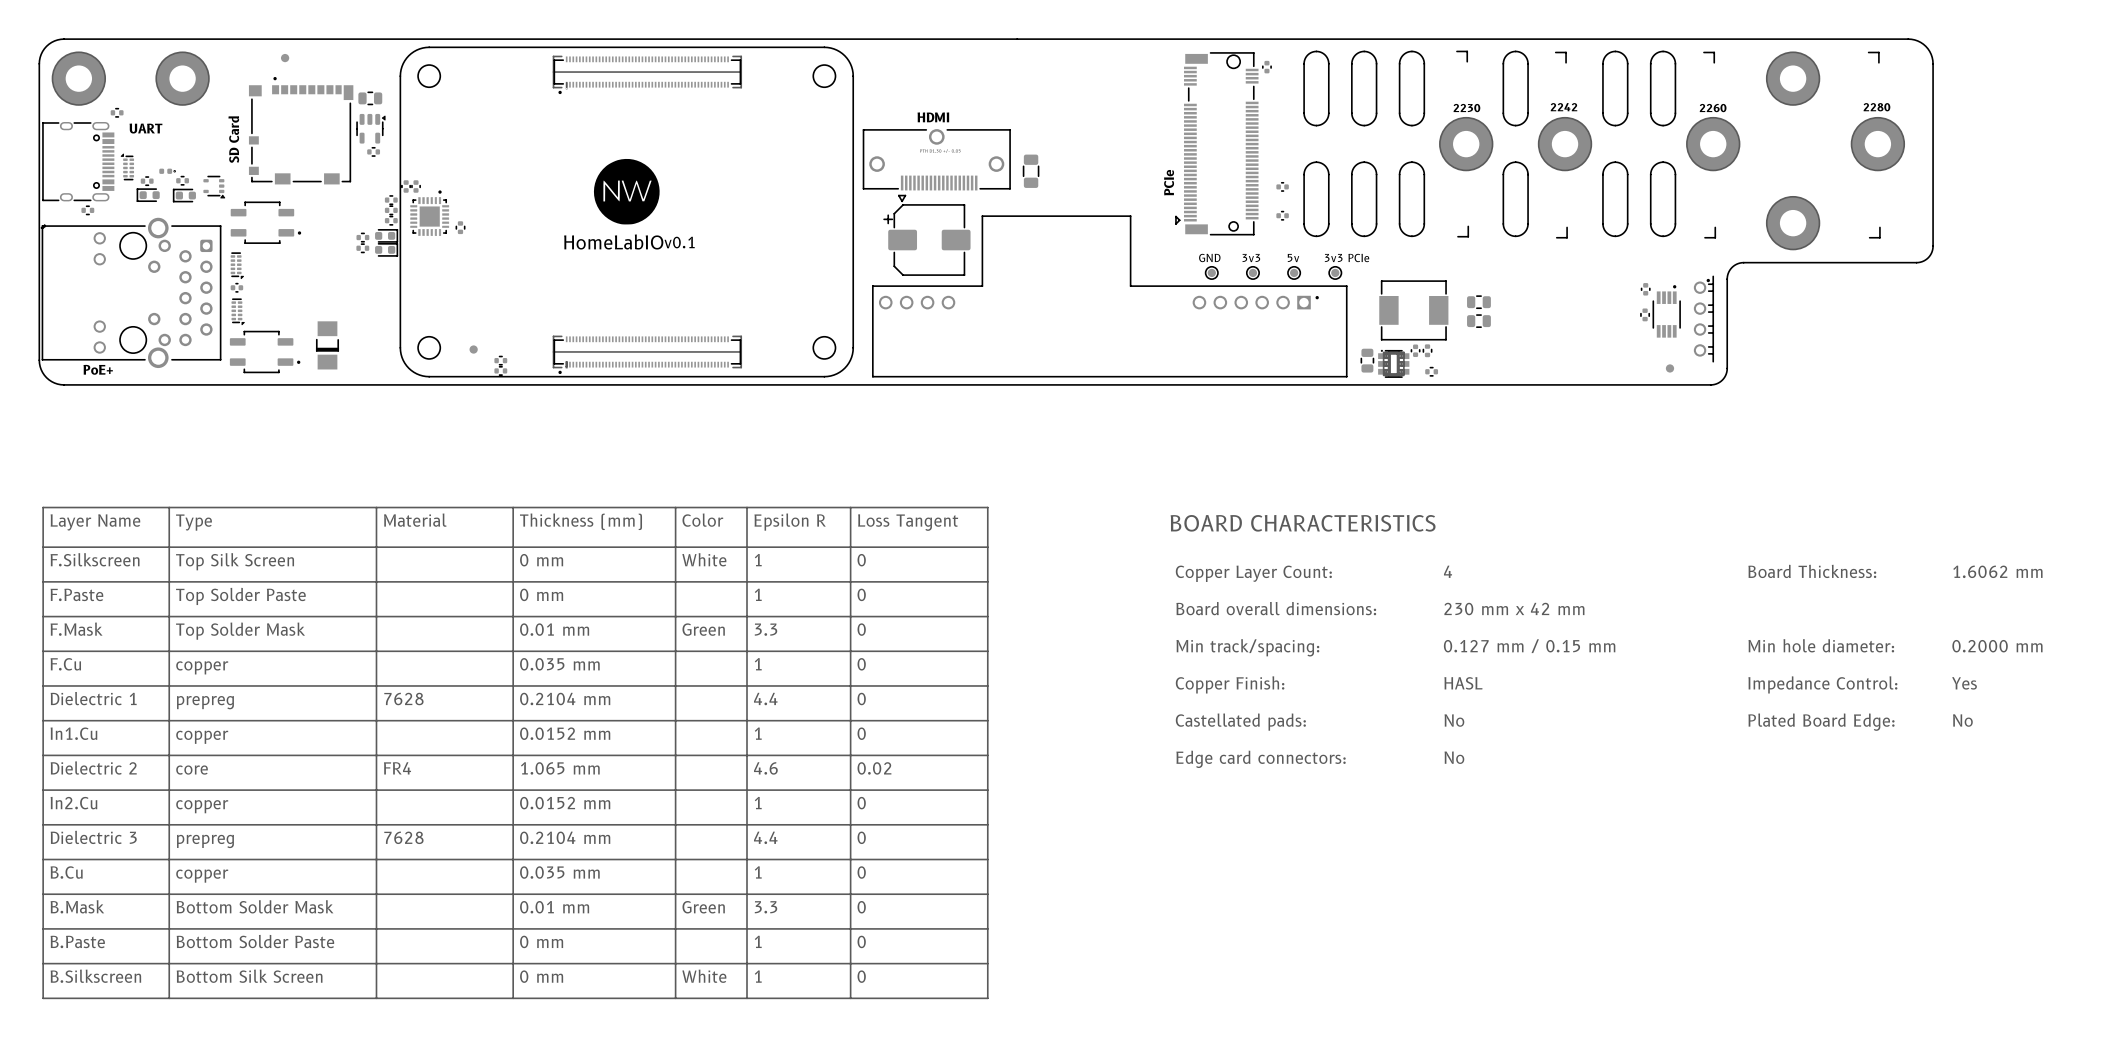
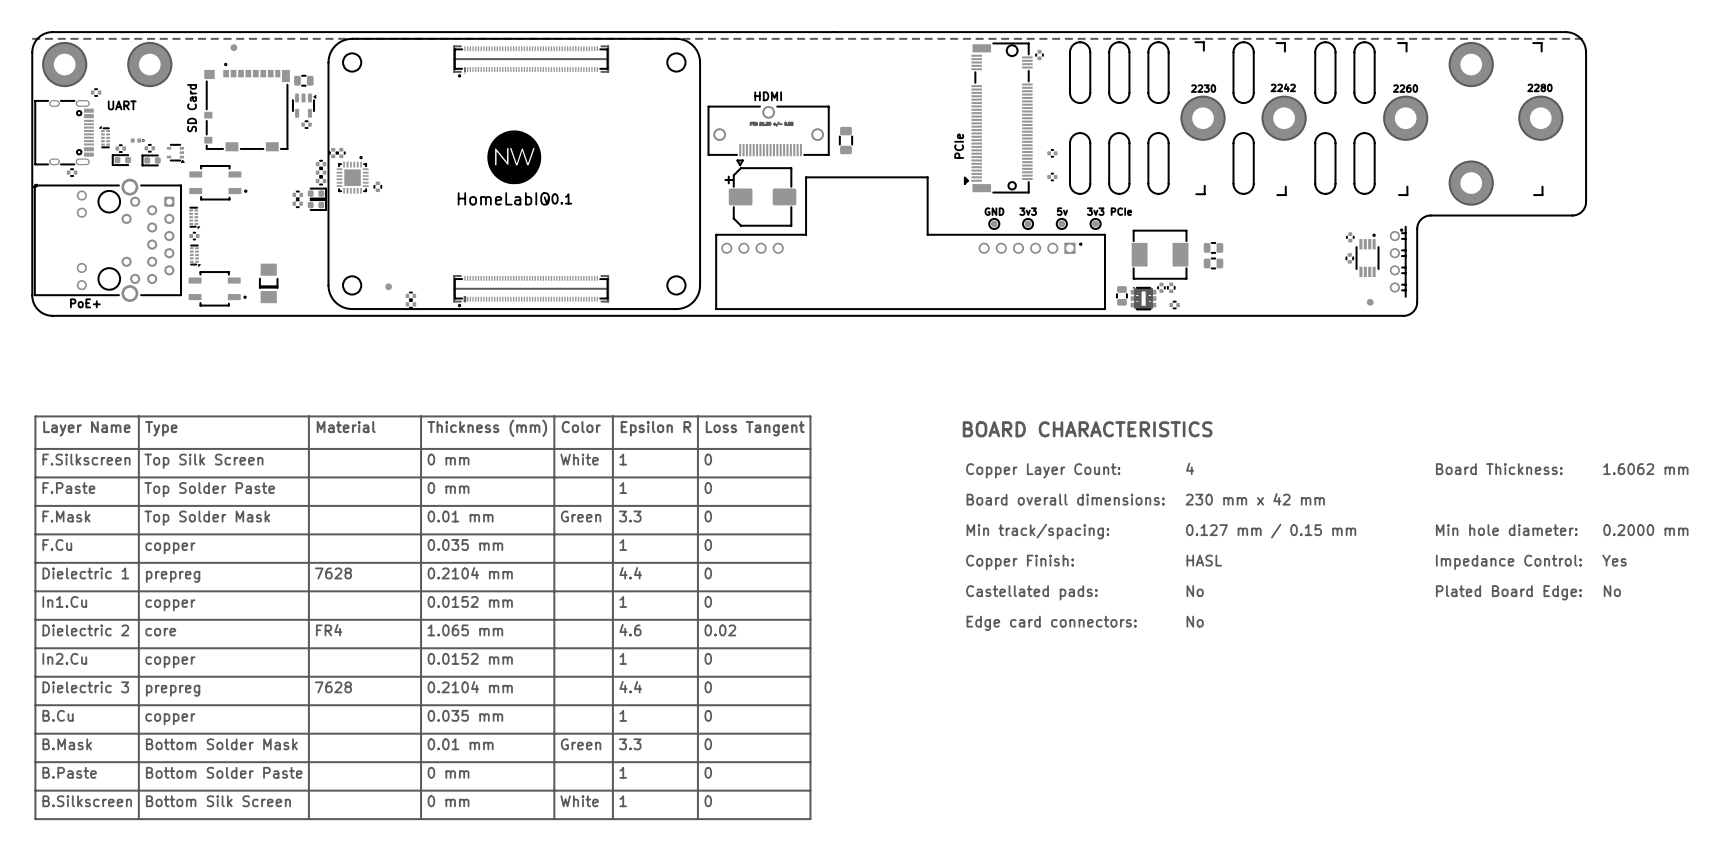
line: none -> (32, 38) (1586, 38)

